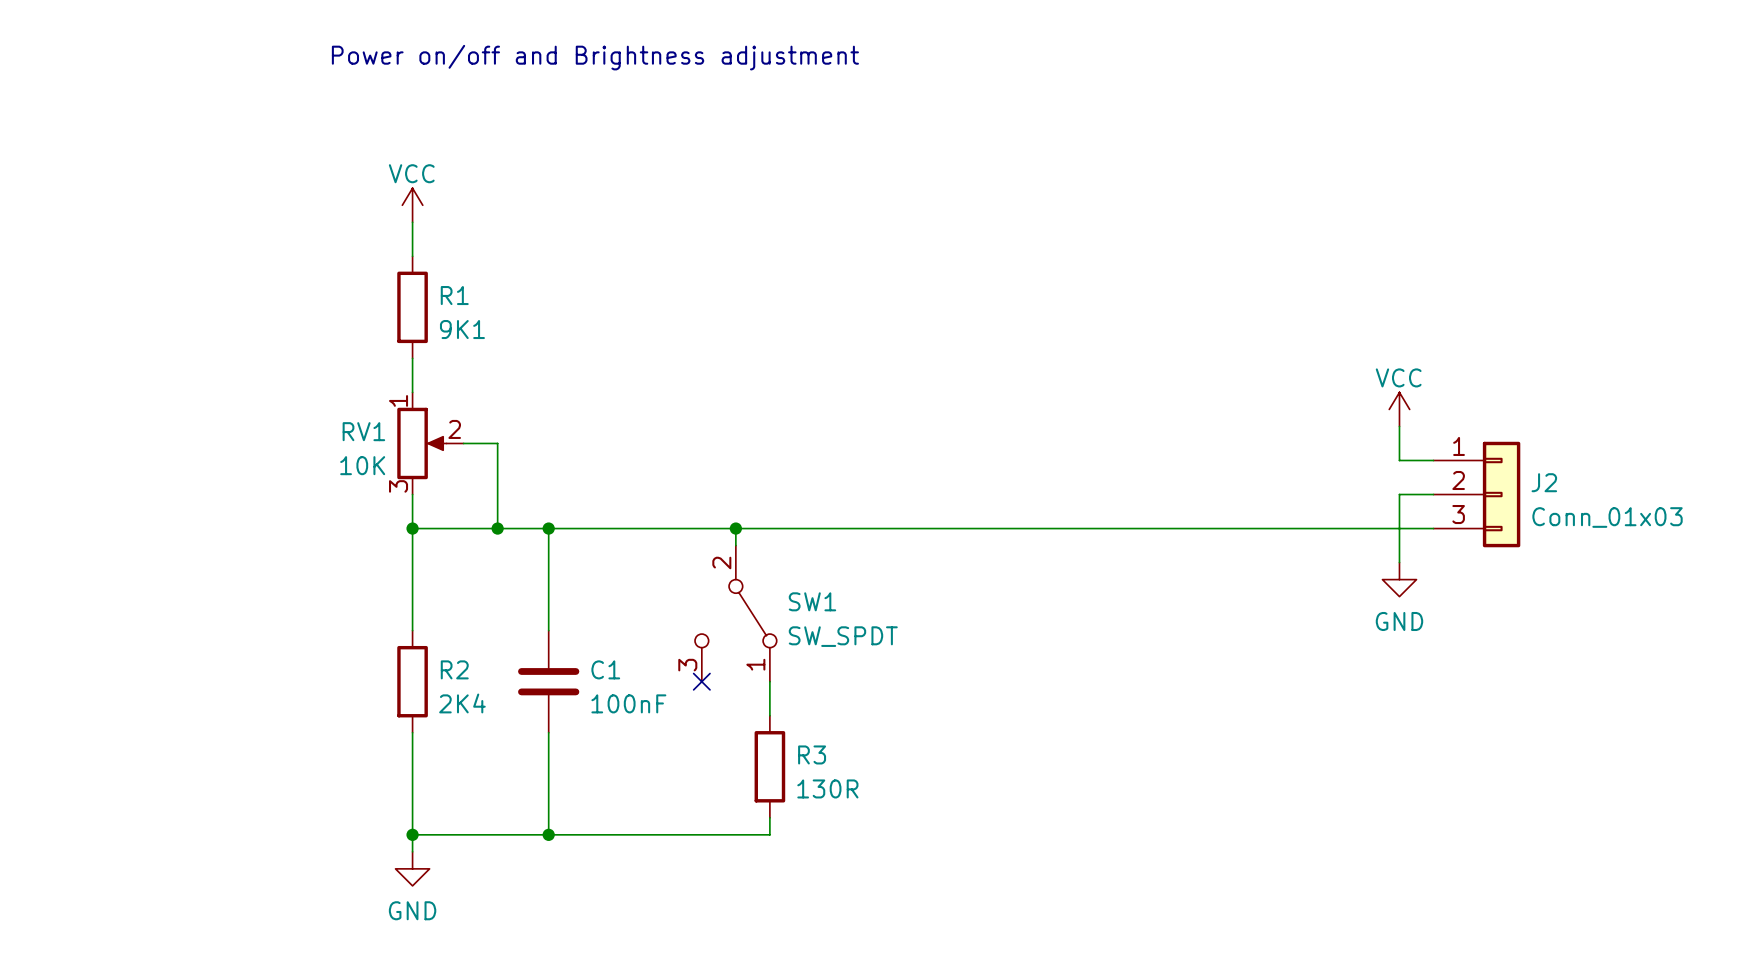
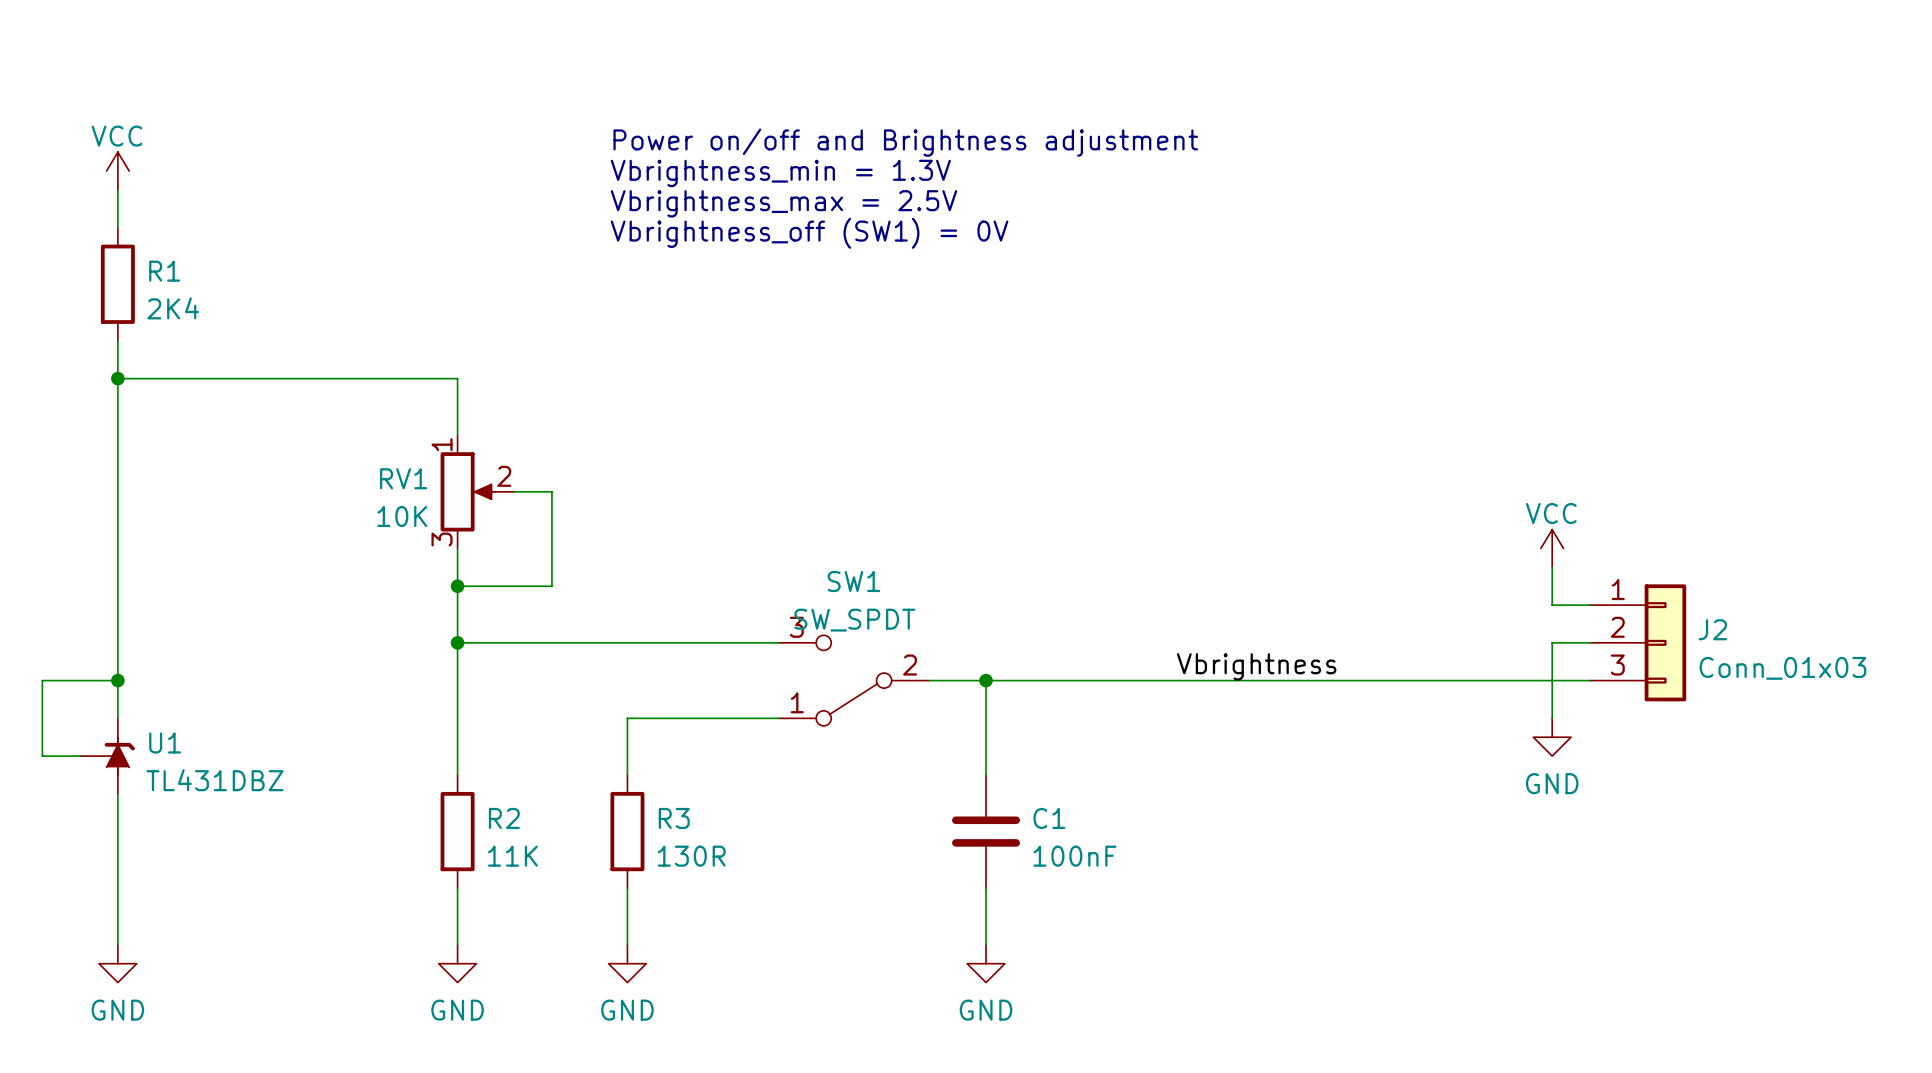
text position: Power on/off and Brightness adjustment (595, 57) -> Power on/off and Brightness adjustment (905, 142)
text: none -> Vbrightness_min = 1.3V (780, 173)
text: none -> Vbrightness_max = 2.5V (783, 203)
power symbol position: VCC (412, 205) -> VCC (117, 171)
text: none -> Vbrightness_off (SW1) = 0V (809, 233)
wire: (412, 222) (412, 256) -> (117, 189) (117, 227)
wire: none -> (117, 340) (117, 718)
R1 position: (412, 307) -> (117, 284)
R1 value: 9K1 (462, 329) -> 2K4 (173, 308)
wire: none -> (117, 378) (457, 378) (457, 397)
junction: none -> (117, 378)
power symbol position: VCC (1399, 409) -> VCC (1552, 548)
wire: (1399, 426) (1399, 460) (1433, 460) -> none
wire: (1433, 494) (1399, 494) (1399, 511) -> none
J2 position: (1476, 494) -> (1638, 642)
wire: (497, 528) (1433, 528) -> none
junction: (497, 528) -> none
wire: (548, 528) (548, 630) -> none
junction: (548, 528) -> none
wire: (735, 528) (735, 545) -> none
junction: (735, 528) -> none
wire: (1399, 545) (1399, 562) -> (1552, 605) (1589, 605)
wire: none -> (457, 642) (778, 642)
junction: none -> (457, 642)
power symbol position: GND (1399, 579) -> GND (1552, 737)
wire: none -> (1589, 642) (1552, 642) (1552, 718)
SW1 name position: SW1 (812, 601) -> SW1 (853, 581)
label: none -> Vbrightness (1256, 666)
wire: none -> (117, 680) (42, 680) (42, 756) (80, 756)
junction: none -> (117, 680)
SW1 rotation: 0° (735, 613) -> 90° clockwise (853, 680)
wire: none -> (929, 680) (1589, 680)
wire: none -> (986, 680) (986, 774)
junction: none -> (986, 680)
SW1 value position: SW_SPDT (843, 636) -> SW_SPDT (854, 620)
wire: none -> (778, 718) (627, 718) (627, 774)
U1: none -> TL431DBZ (107, 756)
R2 position: (412, 681) -> (457, 831)
C1 position: (548, 681) -> (986, 831)
no-connect mark: (701, 681) -> none
wire: (769, 681) (769, 715) -> none
R2 value: 2K4 (462, 703) -> 11K (512, 856)
wire: none -> (117, 793) (117, 944)
wire: (412, 732) (412, 800) -> (457, 699) (457, 774)
wire: (548, 732) (548, 834) -> none
R3 position: (769, 766) -> (627, 831)
wire: none -> (627, 888) (627, 944)
wire: none -> (986, 888) (986, 944)
wire: (769, 817) (769, 834) (412, 834) -> none
junction: (412, 834) -> none
junction: (548, 834) -> none
power symbol: none -> GND (117, 963)
power symbol: none -> GND (627, 963)
power symbol: none -> GND (986, 963)

